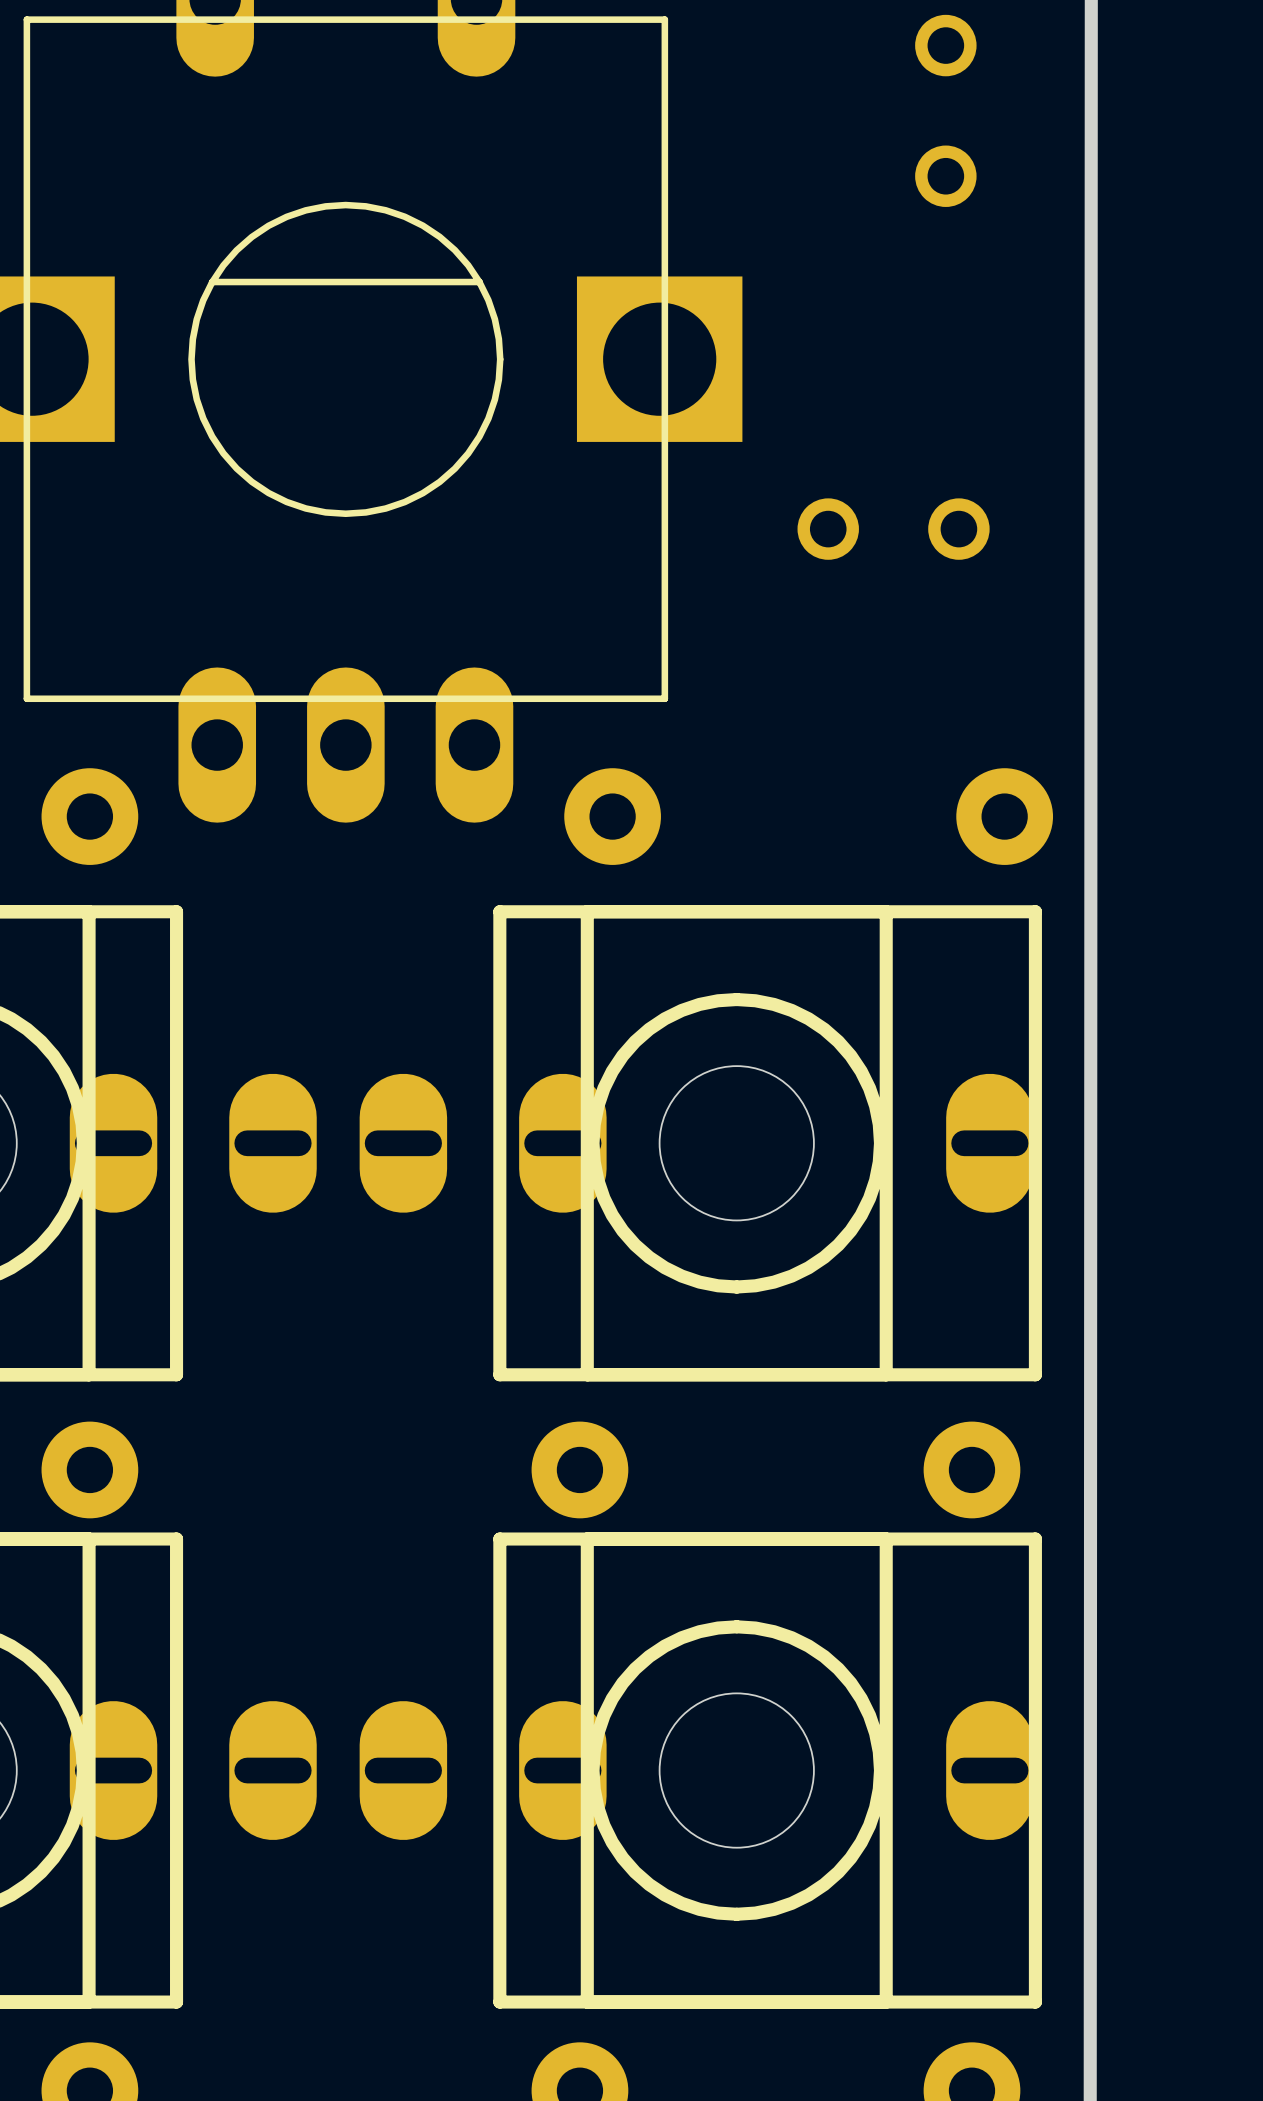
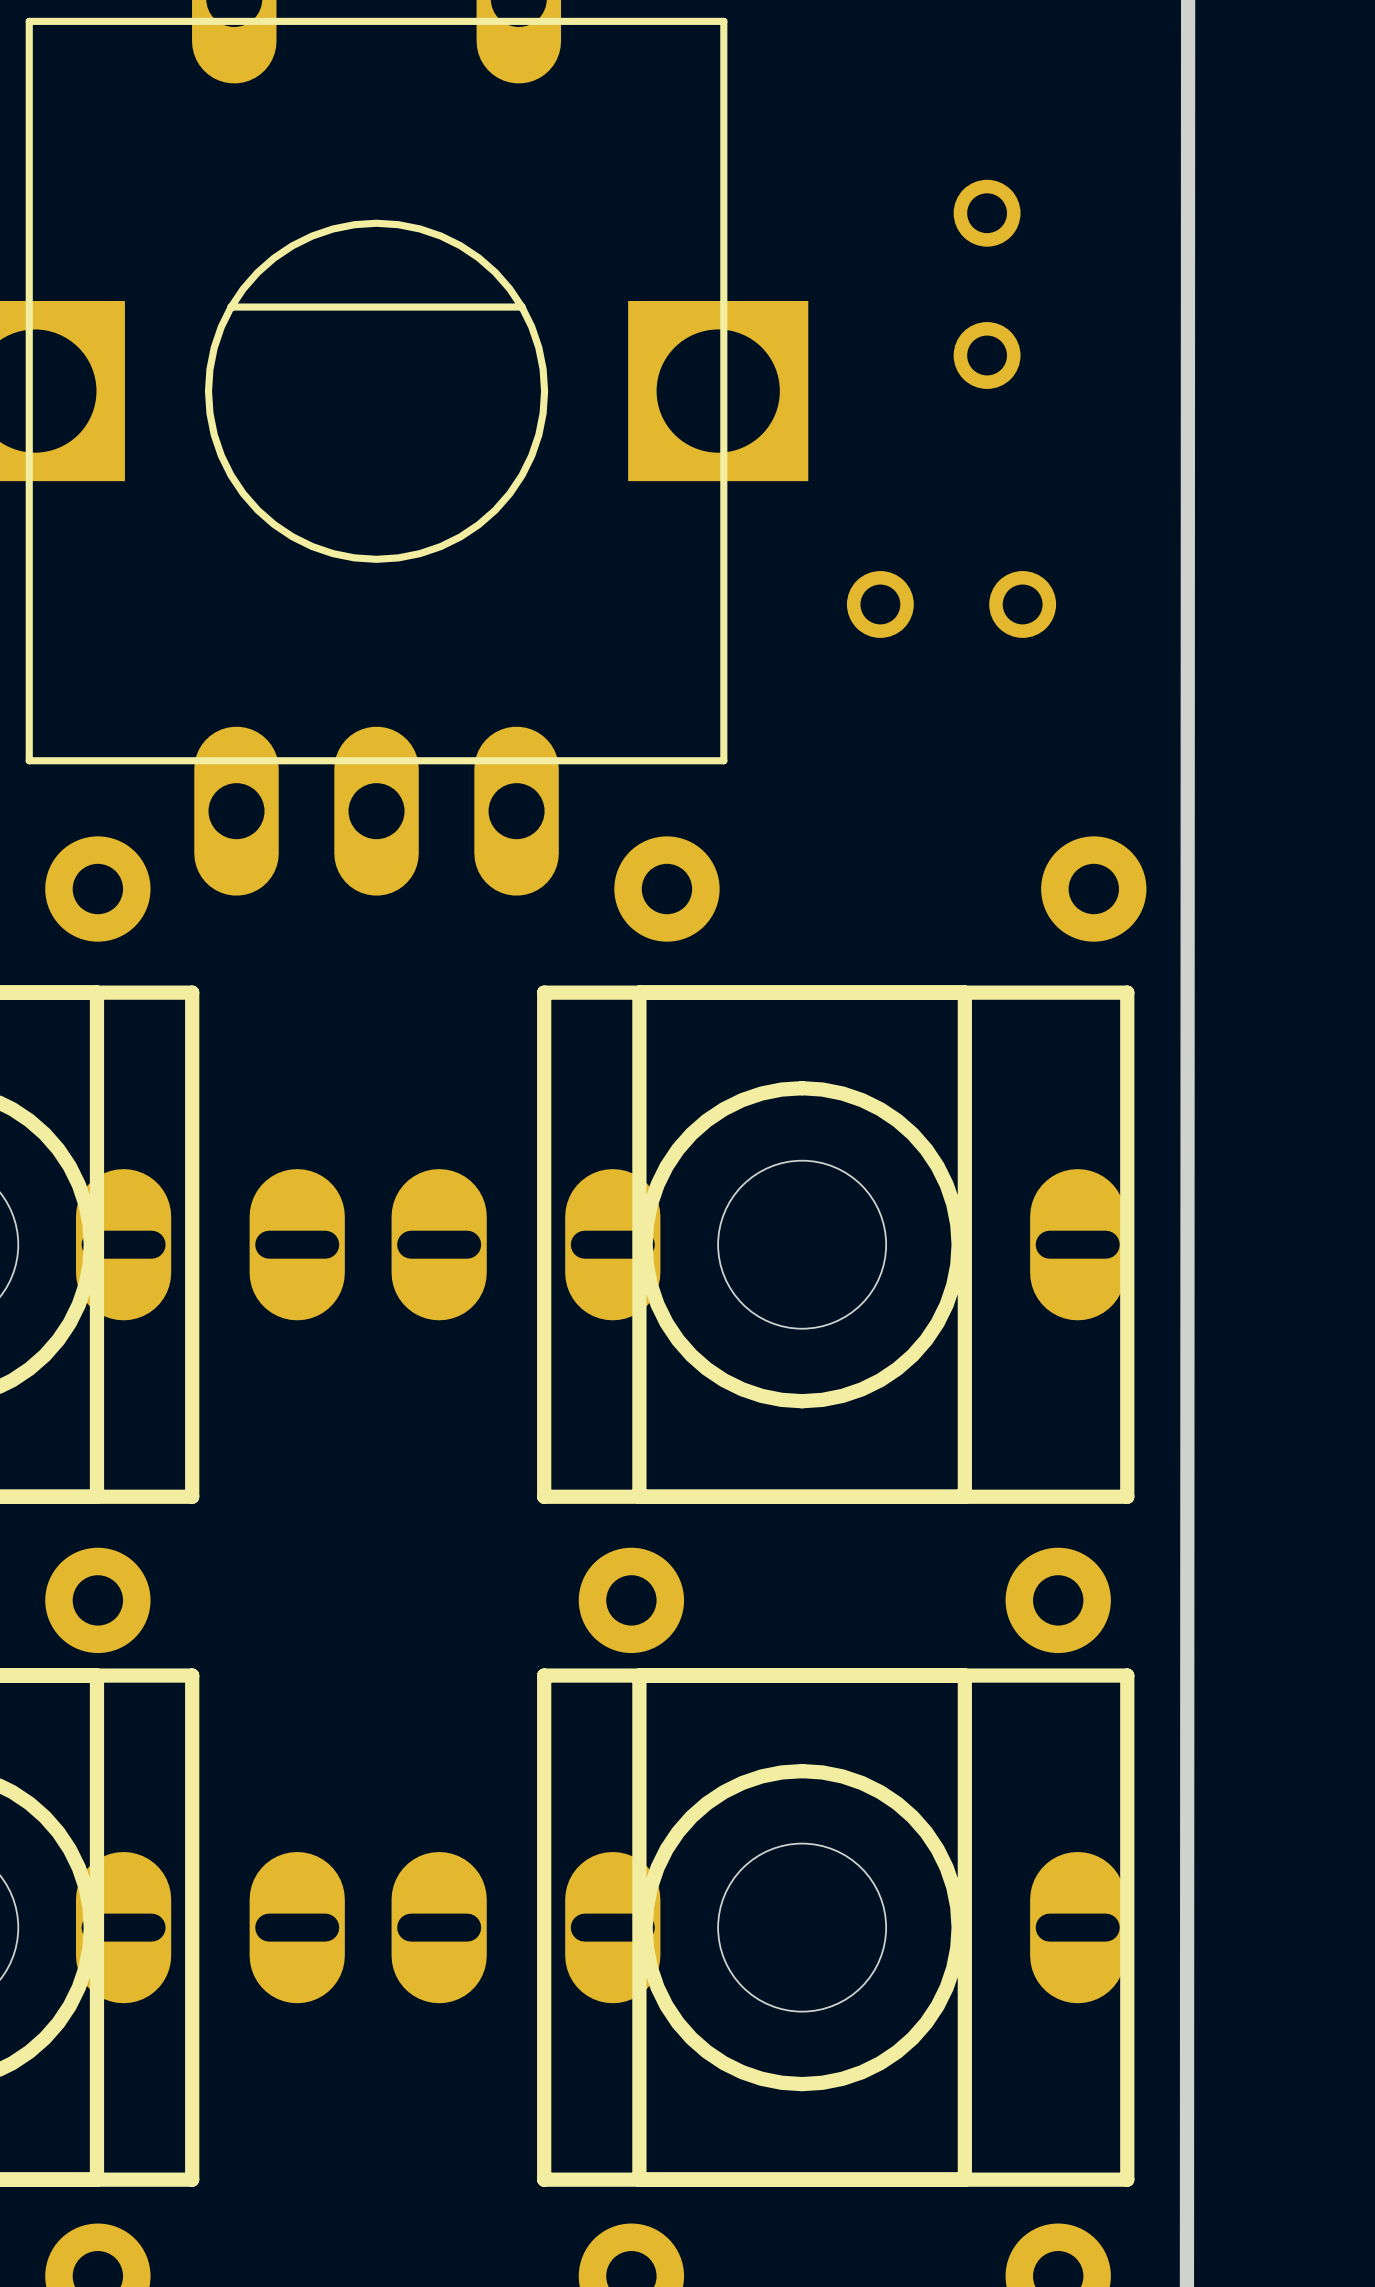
part position: (945, 110) -> (987, 284)
part position: (893, 529) -> (951, 604)

